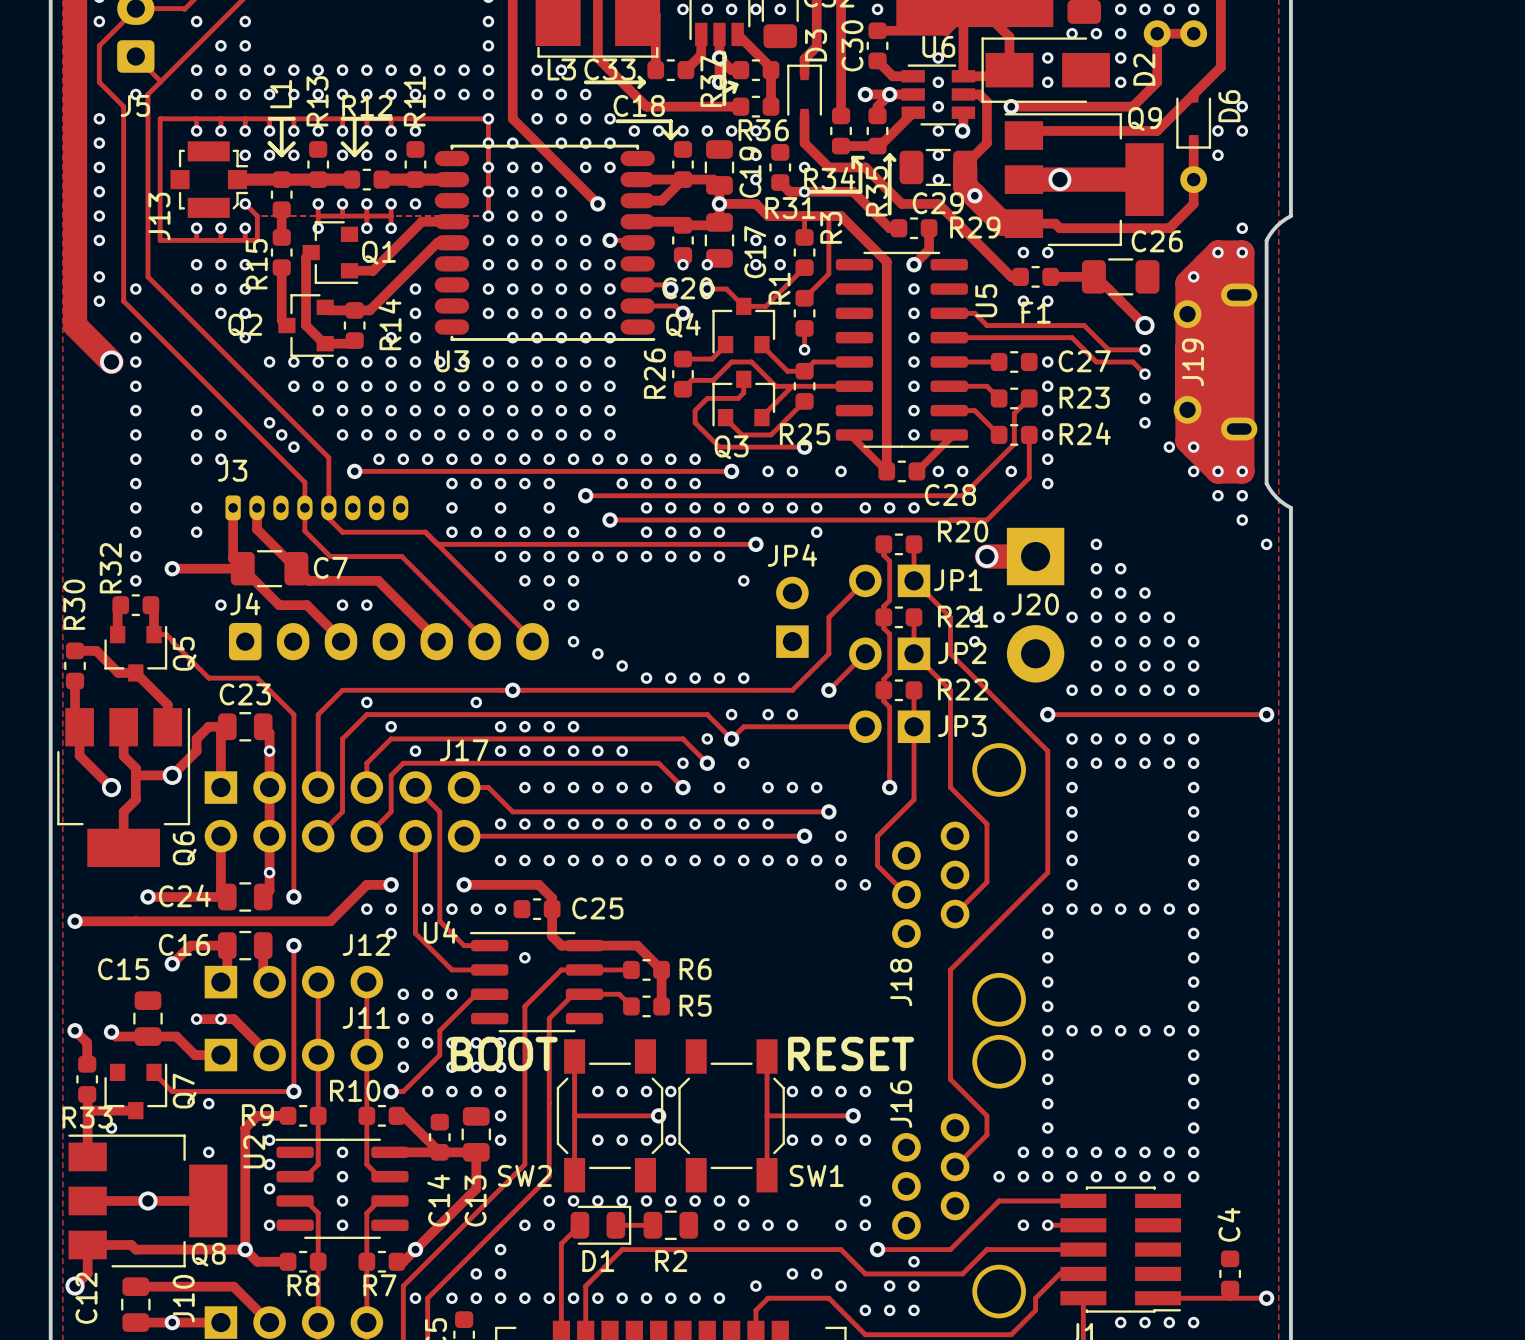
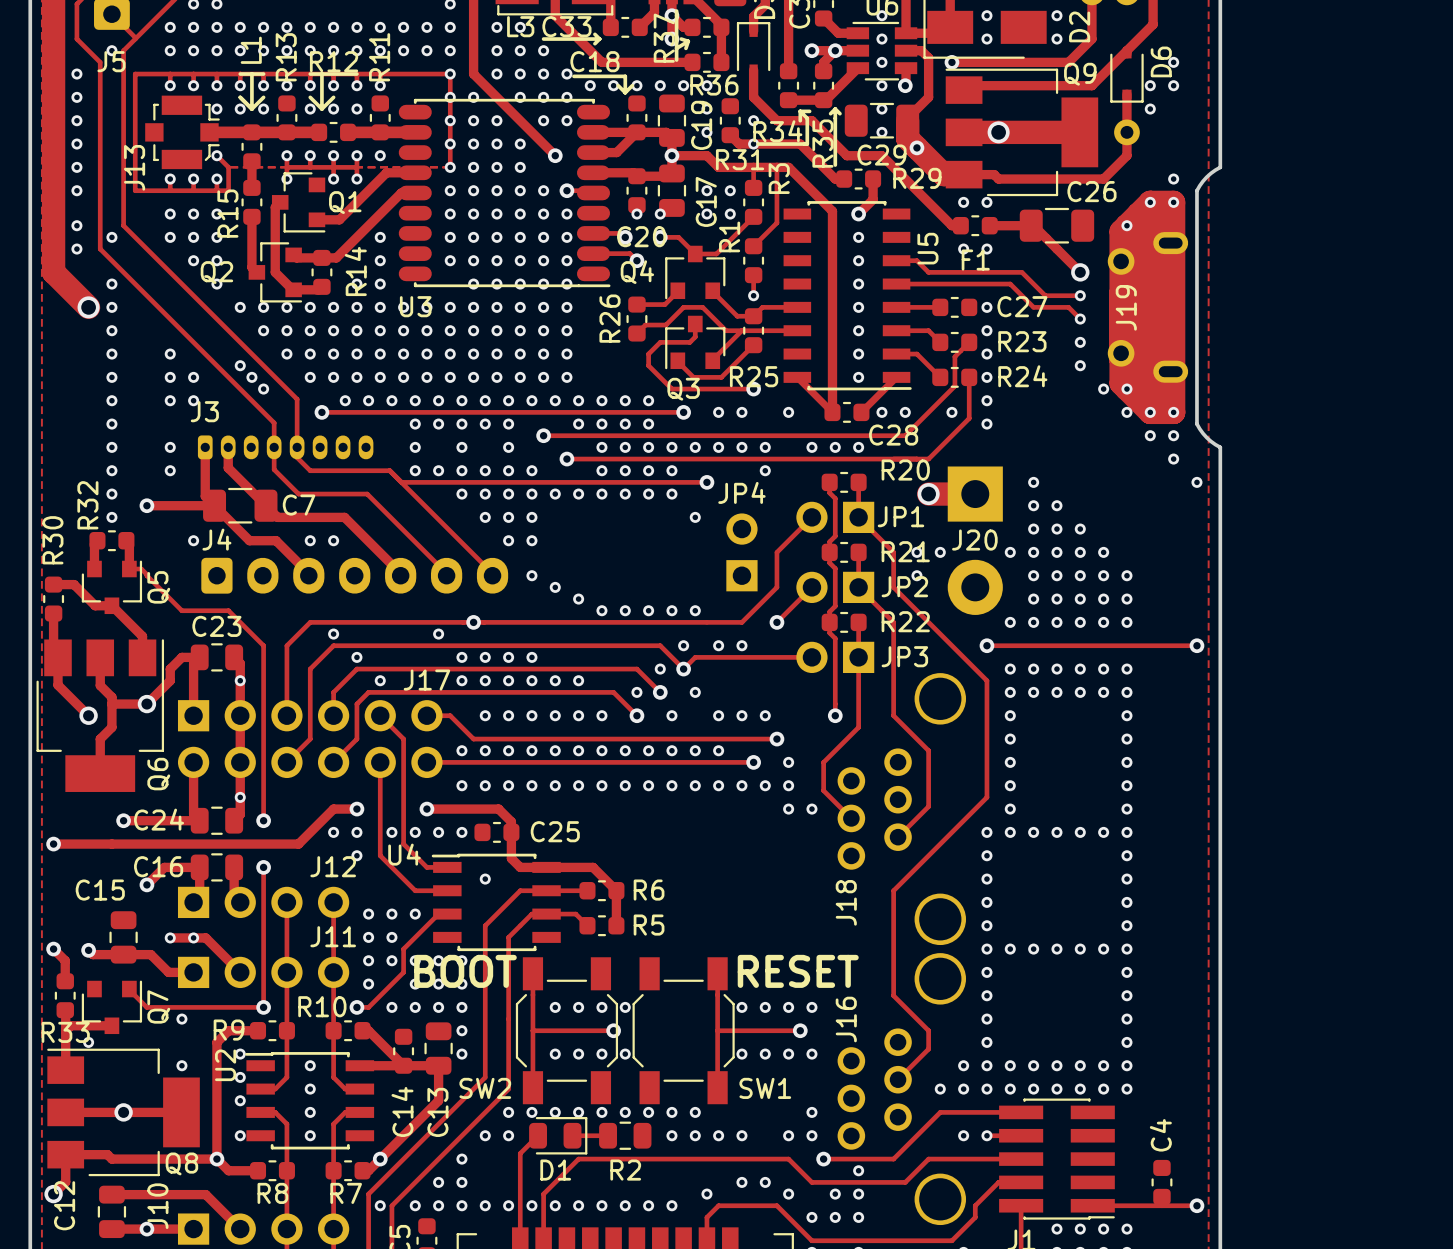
U5 footprint: [835, 251, 970, 448] -> [783, 201, 912, 391]
U4 footprint: [469, 931, 604, 1033] -> [431, 853, 561, 952]
U2 footprint: [275, 1138, 409, 1239] -> [245, 1052, 375, 1150]

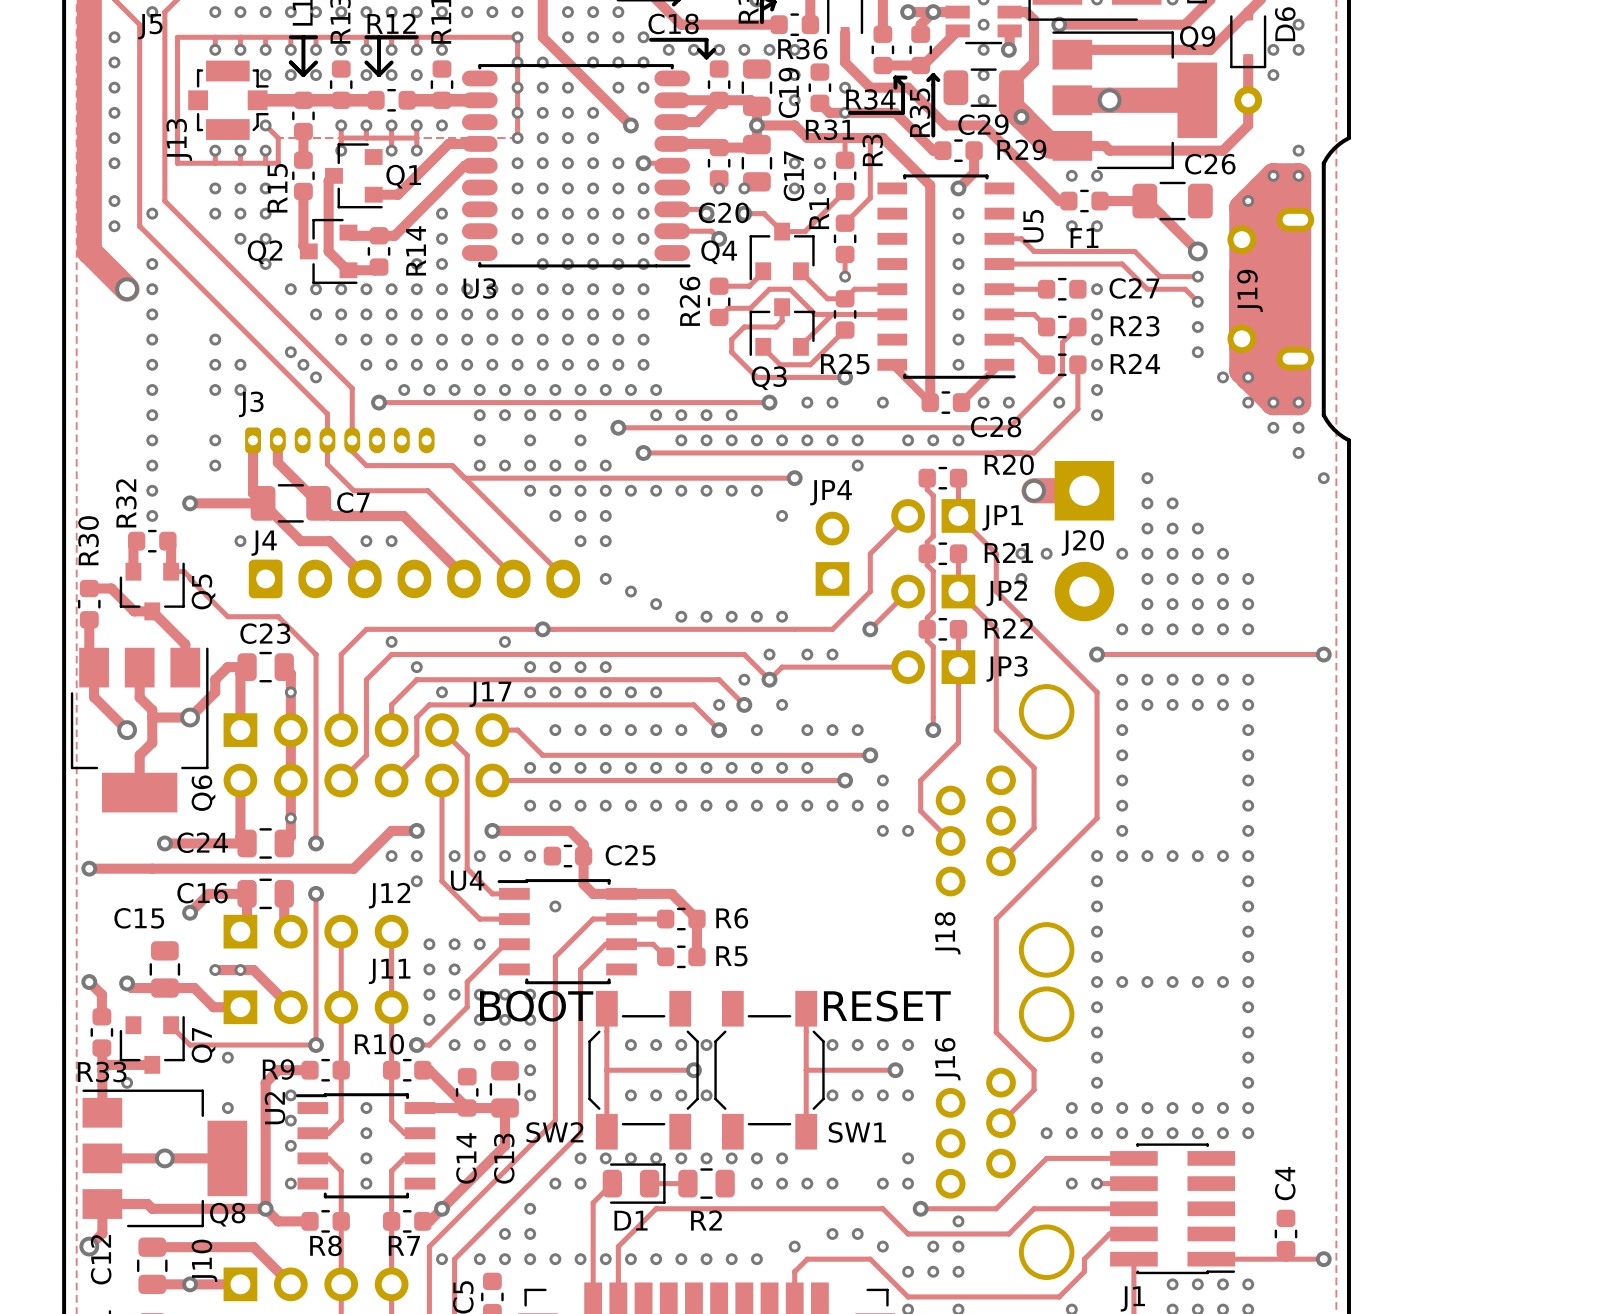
via: (601, 400) -> none
via: (625, 400) -> none
via: (648, 400) -> none
via: (601, 470) -> none
via: (625, 470) -> none
via: (648, 470) -> none
via: (671, 470) -> none

